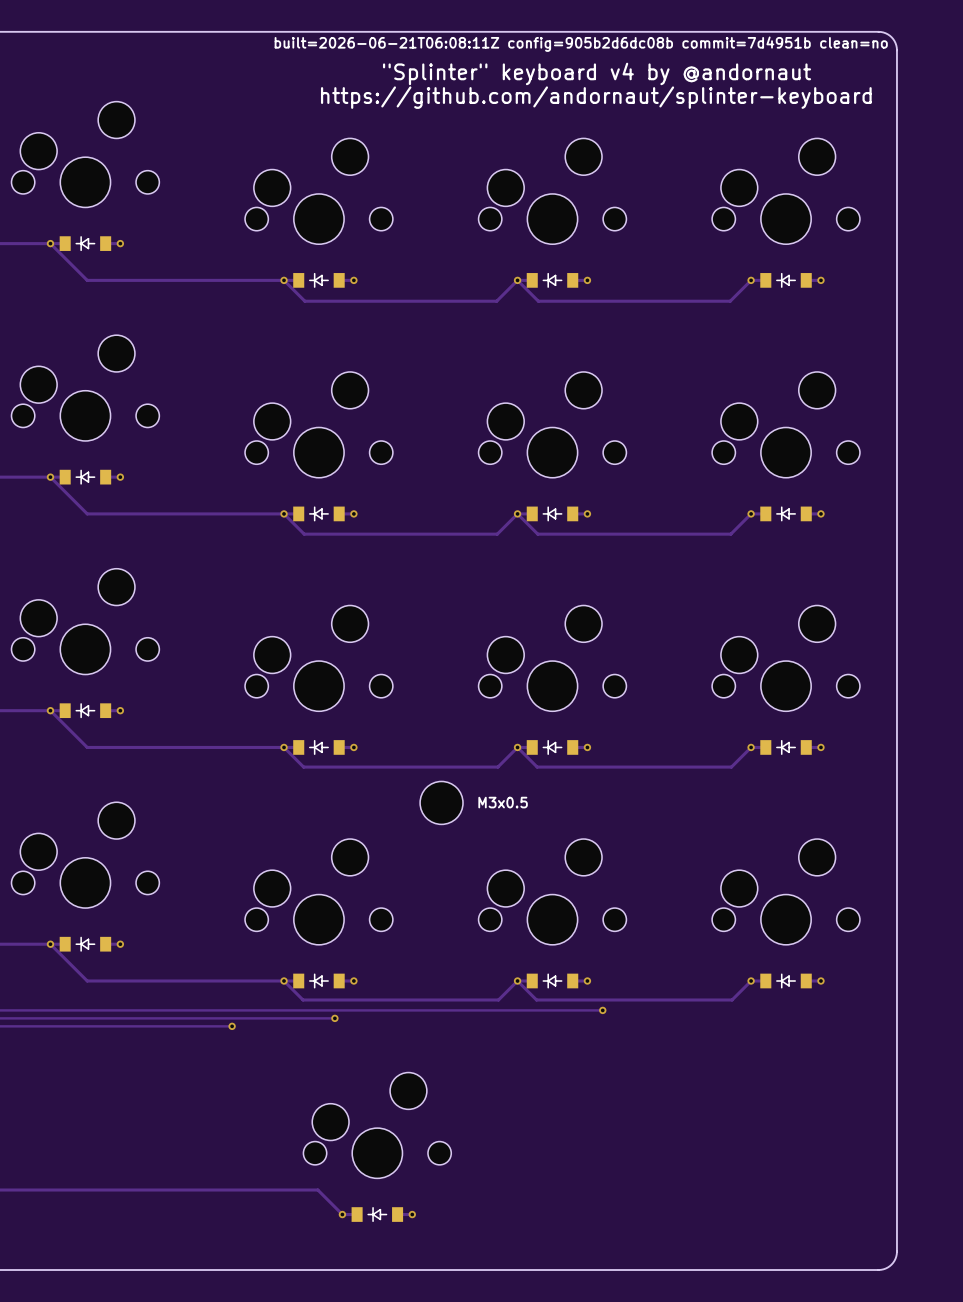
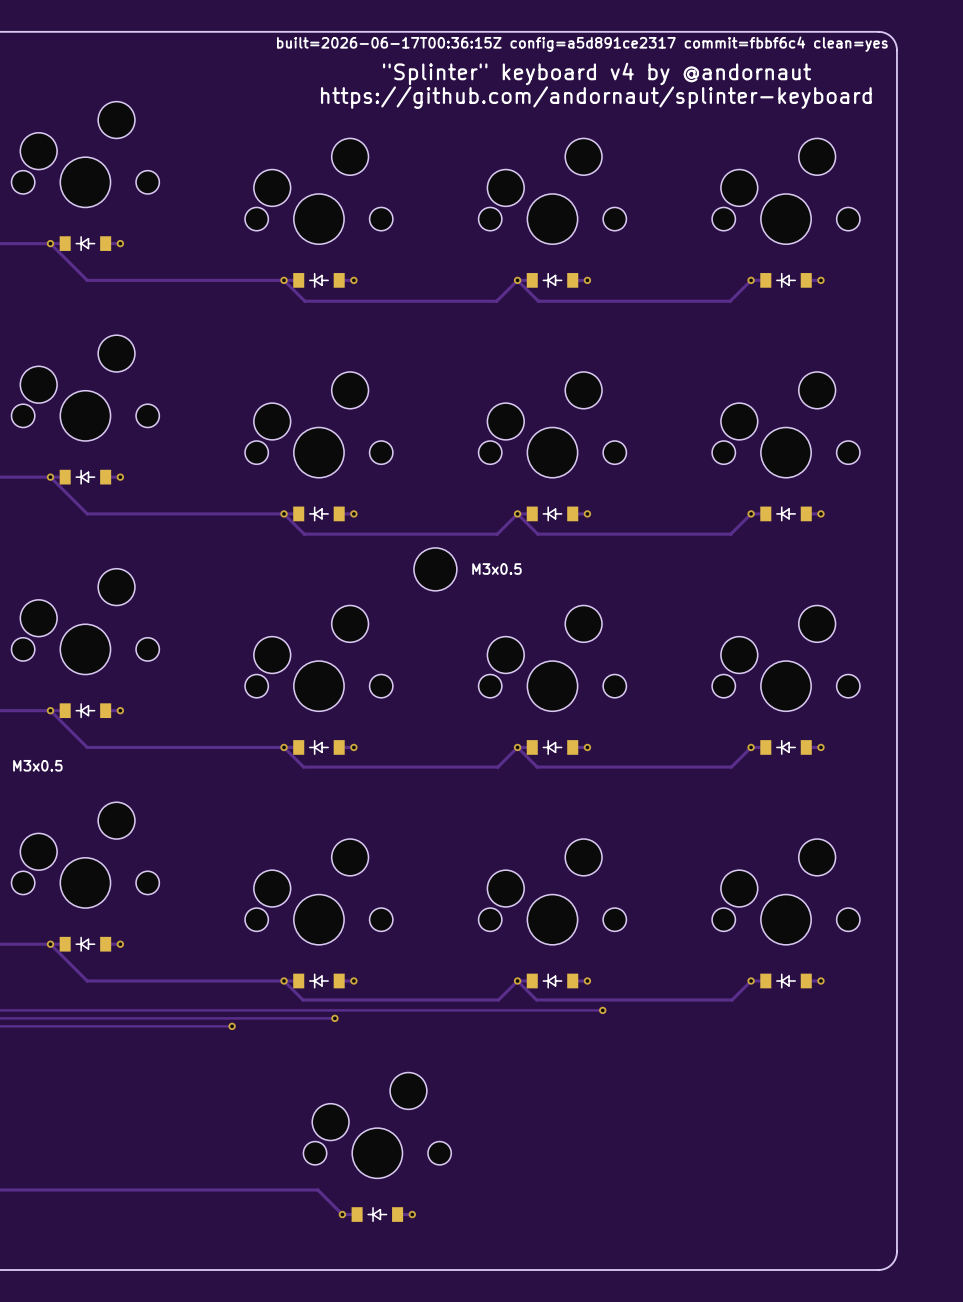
text: built=2026-06-21T06:08:11Z config=905b2d6dc08b commit=7d4951b clean=no (581, 44) -> built=2026-06-17T00:36:15Z config=a5d891ce2317 commit=fbbf6c4 clean=yes (582, 44)
part: none -> (435, 569)
text: none -> M3x0.5 (496, 569)
text: none -> M3x0.5 (37, 765)
part: (441, 802) -> none
text: M3x0.5 (503, 802) -> none

